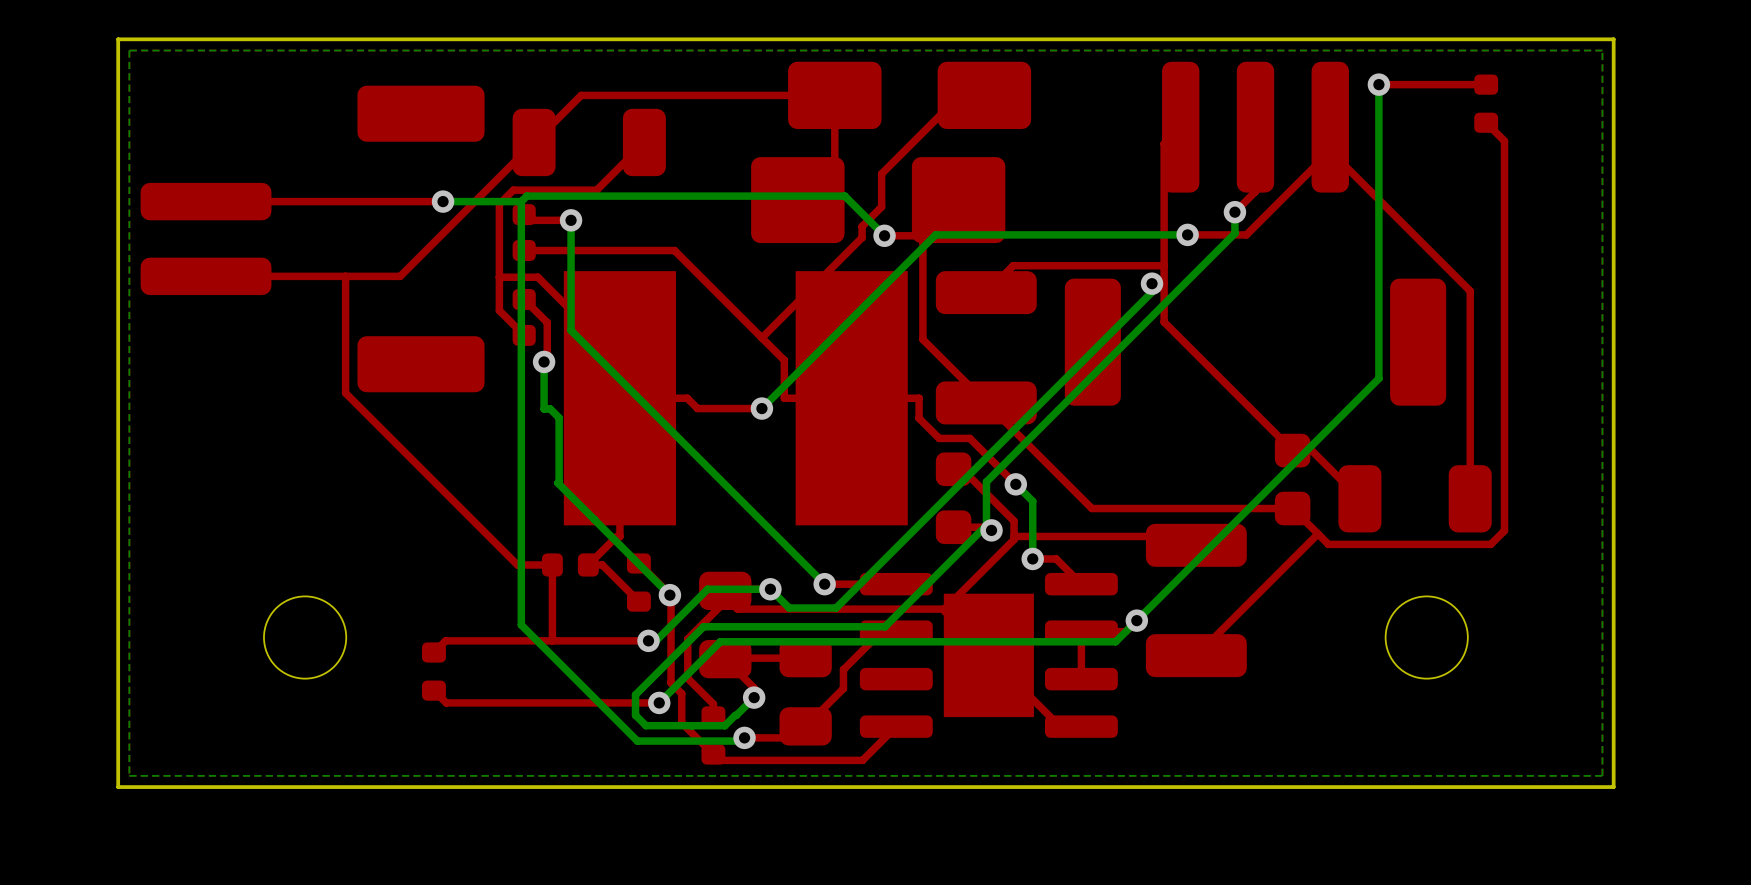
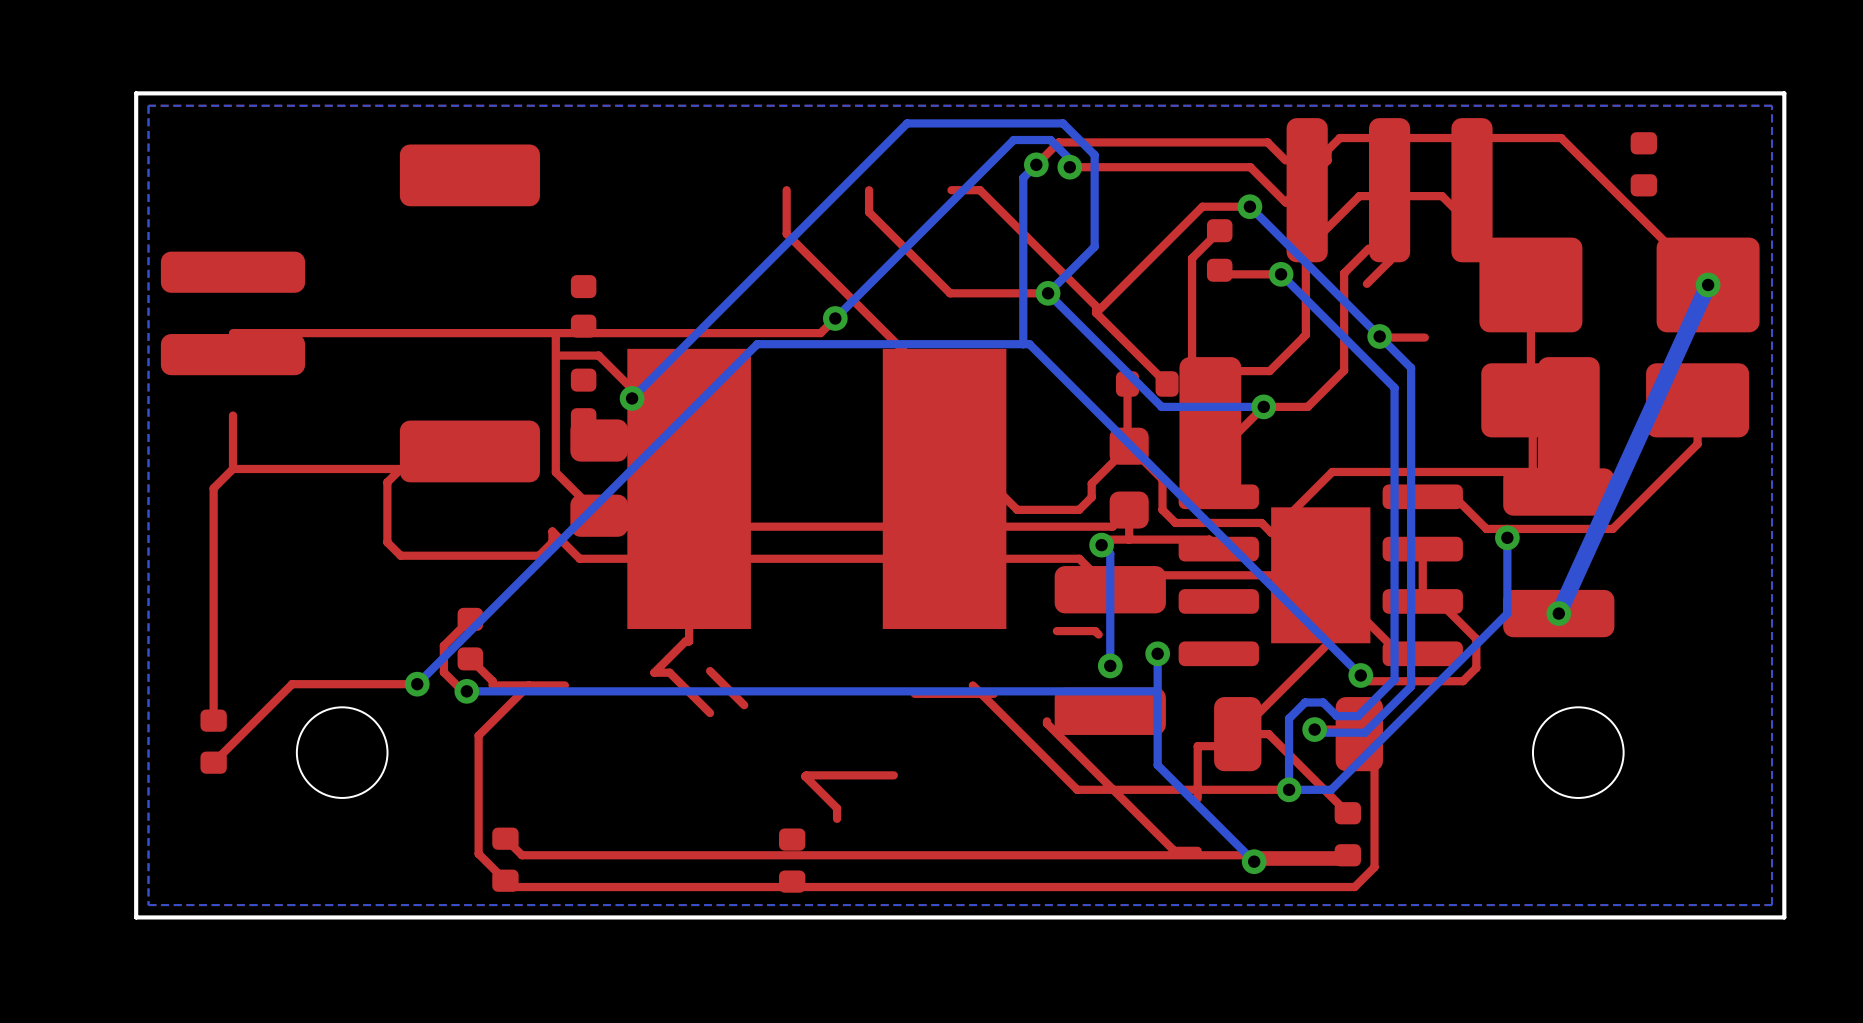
bottom track: (1378, 84) (1378, 378) (1115, 641) (720, 641) (659, 702) -> none
via: (1378, 84) -> none
top track: (1486, 84) (1378, 84) -> none
part position: (909, 95) -> (1615, 400)
top track: (984, 95) (960, 95) (881, 173) (881, 206) (862, 226) (862, 237) (761, 337) -> none
top track: none -> (1285, 160) (1267, 142) (1058, 142) (1036, 164)
bottom track: none -> (1036, 164) (1023, 177) (1023, 344)
via: none -> (1036, 164)
top track: none -> (1069, 167) (1250, 167) (1285, 202) (1327, 160) (1327, 150) (1339, 138) (1561, 138) (1708, 284)
bottom track: none -> (1069, 167) (1069, 159) (1050, 140) (1013, 140) (835, 318)
via: none -> (1069, 167)
top track: (1486, 122) (1504, 141) (1504, 530) (1490, 544) (1328, 544) (1292, 508) (1091, 508) (922, 339) (922, 235) -> none
top track: none -> (786, 190) (786, 233) (941, 388) (941, 433) (1017, 509) (1079, 509) (1091, 497) (1091, 483) (1129, 446)
top track: none -> (869, 190) (869, 212) (950, 293) (1048, 293)
top track: none -> (951, 190) (980, 190) (1096, 306) (1096, 313)
top track: (1180, 127) (1164, 143) (1164, 322) (1292, 450) (1311, 450) (1359, 498) -> none
part: (589, 142) -> none
top track: (644, 142) (596, 190) (513, 190) (499, 204) (499, 310) (524, 335) -> none
top track: none -> (1249, 206) (1202, 206) (1096, 313)
bottom track: none -> (1249, 206) (1411, 367) (1411, 686) (1364, 732) (1317, 732) (1314, 729)
via: none -> (1249, 206)
top track: (1330, 151) (1246, 234) (1187, 234) -> none
top track: (1330, 151) (1470, 291) (1470, 498) -> none
top track: none -> (1219, 230) (1192, 258) (1192, 470) (1218, 496)
top track: none -> (1368, 248) (1344, 273) (1344, 370) (1307, 406) (1263, 406) (1235, 434) (1229, 434)
part: none -> (1219, 250)
top track: none -> (1219, 270) (1223, 274) (1281, 274)
top track: (797, 200) (834, 163) (834, 95) (581, 95) (400, 276) (206, 276) -> none
part position: (878, 200) -> (1619, 284)
top track: (443, 201) (206, 201) -> none
via: (443, 201) -> none
bottom track: (521, 201) (443, 201) -> none
bottom track: (521, 201) (521, 625) (637, 741) (741, 741) (744, 737) -> none
bottom track: (521, 201) (526, 196) (844, 196) (884, 235) -> none
bottom track: none -> (1281, 274) (1394, 387) (1394, 679) (1358, 716) (1336, 716) (1323, 702) (1305, 702) (1289, 718) (1289, 789) (1331, 789) (1507, 613) (1507, 537)
via: none -> (1281, 274)
bottom track: (1234, 212) (1234, 233) (986, 481) (986, 525) -> none
via: (1234, 212) -> none
bottom track: none -> (1708, 284) (1558, 613)
via: none -> (1708, 284)
top track: (524, 214) (529, 220) (571, 220) -> none
bottom track: (571, 220) (571, 330) (824, 584) -> none
via: (571, 220) -> none
bottom track: (1187, 234) (935, 234) (761, 408) -> none
via: (1187, 234) -> none
via position: (884, 235) -> (1048, 293)
top track: (922, 235) (884, 235) -> none
top track: none -> (1096, 313) (1167, 383)
top track: none -> (835, 318) (820, 333) (232, 333)
via: none -> (835, 318)
top track: (524, 250) (674, 250) (784, 360) (784, 398) (919, 398) (919, 418) (939, 438) (969, 438) (1015, 484) -> none
top track: none -> (555, 333) (555, 472) (610, 526) (1112, 526) (1129, 510) (1129, 539)
top track: none -> (1379, 336) (1424, 337)
via: none -> (1379, 336)
top track: (1164, 265) (1013, 265) (986, 292) -> none
top track: (345, 276) (345, 393) (517, 564) (552, 564) (552, 640) -> none
bottom track: (1152, 283) (1152, 292) (836, 608) (789, 608) (770, 589) (707, 589) (656, 640) (648, 640) -> none
via: (1152, 283) -> none
top track: none -> (1229, 371) (1269, 371) (1305, 334) (1305, 249) (1359, 196) (1442, 196) (1530, 284) (1532, 471)
top track: (524, 299) (547, 322) (547, 358) (544, 361) -> none
top track: none -> (1127, 383) (1127, 444) (1162, 479) (1162, 509) (1175, 522) (1261, 522) (1271, 532) (1332, 471) (1538, 471) (1558, 492)
part: none -> (1147, 383)
bottom track: none -> (632, 398) (907, 123) (1063, 123) (1094, 155) (1094, 246) (1048, 293) (1161, 406) (1263, 406)
via: none -> (632, 398)
top track: none -> (1697, 400) (1697, 444) (1612, 528) (1486, 528) (1454, 496) (1422, 496)
via: none -> (1263, 406)
top track: none -> (232, 415) (232, 468)
part position: (986, 347) -> (1110, 650)
bottom track: (544, 361) (544, 409) (550, 409) (559, 417) (557, 483) (669, 595) -> none
via: (544, 361) -> none
top track: none -> (232, 468) (400, 468) (387, 482) (387, 542) (400, 555) (539, 555) (552, 542) (552, 531) (579, 558) (1079, 558) (1110, 589) (1124, 575) (1320, 575) (1399, 653) (1422, 653)
top track: none -> (232, 468) (213, 488) (213, 720)
part: none -> (599, 478)
top track: (619, 398) (687, 398) (697, 408) (761, 408) -> none
via: (761, 408) -> none
via: none -> (1507, 537)
top track: none -> (1101, 545) (1107, 539) (1209, 539) (1218, 549)
bottom track: none -> (1101, 545) (1110, 553) (1110, 665)
via: none -> (1101, 545)
top track: none -> (1422, 549) (1422, 601) (1438, 601) (1476, 638) (1476, 667) (1462, 681) (1366, 681) (1360, 675)
part: none -> (1558, 552)
top track: (953, 469) (962, 469) (1014, 521) (1014, 539) (944, 609) (737, 609) (727, 599) -> none
part: (1292, 479) -> none
bottom track: (1015, 484) (1032, 501) (1032, 558) -> none
via: (1015, 484) -> none
part position: (953, 498) -> (1129, 478)
part: (1415, 498) -> none
top track: none -> (1358, 613) (1237, 734) (1268, 734) (1347, 813)
via: none -> (1558, 613)
top track: none -> (470, 619) (443, 645) (443, 672) (462, 691) (466, 691)
part footprint: [1145, 523, 1247, 678] -> [1214, 697, 1384, 772]
bottom track: (986, 525) (885, 626) (703, 626) (635, 694) (635, 715) (645, 725) (724, 725) (754, 697) -> none
via: (991, 530) -> none
top track: (1318, 533) (1196, 655) -> none
top track: (1014, 536) (1187, 536) (1196, 545) -> none
bottom track: none -> (1157, 653) (1157, 765) (1254, 861)
top track: none -> (470, 658) (492, 681) (492, 685) (564, 685)
via: none -> (1110, 665)
top track: (1032, 558) (1056, 558) (1081, 584) -> none
via position: (1032, 558) -> (1157, 653)
part rotation: 0° (570, 564) -> 90° clockwise (470, 639)
part position: (570, 564) -> (470, 639)
bottom track: none -> (1360, 675) (1029, 344) (757, 344) (417, 684)
via: none -> (1360, 675)
top track: none -> (417, 684) (292, 684) (213, 762)
via: none -> (417, 684)
top track: none -> (528, 685) (478, 735) (478, 853) (511, 887) (1354, 887) (1374, 867) (1374, 749) (1354, 729) (1314, 729)
top track: none -> (972, 685) (1077, 789) (1289, 789)
via: none -> (466, 691)
bottom track: none -> (1157, 691) (466, 691)
part: (638, 582) -> none
via: (824, 584) -> none
via: (770, 589) -> none
top track: (669, 595) (671, 682) (681, 693) (681, 722) (719, 760) (862, 760) (896, 726) -> none
via: (669, 595) -> none
top track: (727, 599) (687, 638) (687, 678) (713, 704) (713, 716) -> none
via: none -> (1314, 729)
via: (1136, 620) -> none
part: (725, 624) -> none
part: none -> (213, 741)
top track: (896, 631) (881, 631) (843, 669) (843, 688) (794, 737) (744, 737) -> none
top track: (648, 640) (445, 640) (433, 652) -> none
via: (648, 640) -> none
part position: (988, 655) -> (1320, 575)
part position: (433, 671) -> (505, 859)
via: none -> (1289, 789)
top track: (433, 690) (446, 702) (659, 702) -> none
part: (805, 692) -> none
via: (754, 697) -> none
via: (659, 702) -> none
part: none -> (1347, 834)
top track: none -> (505, 838) (522, 855) (1347, 855) (1341, 861) (1254, 861)
via: none -> (1254, 861)
via: (744, 737) -> none

